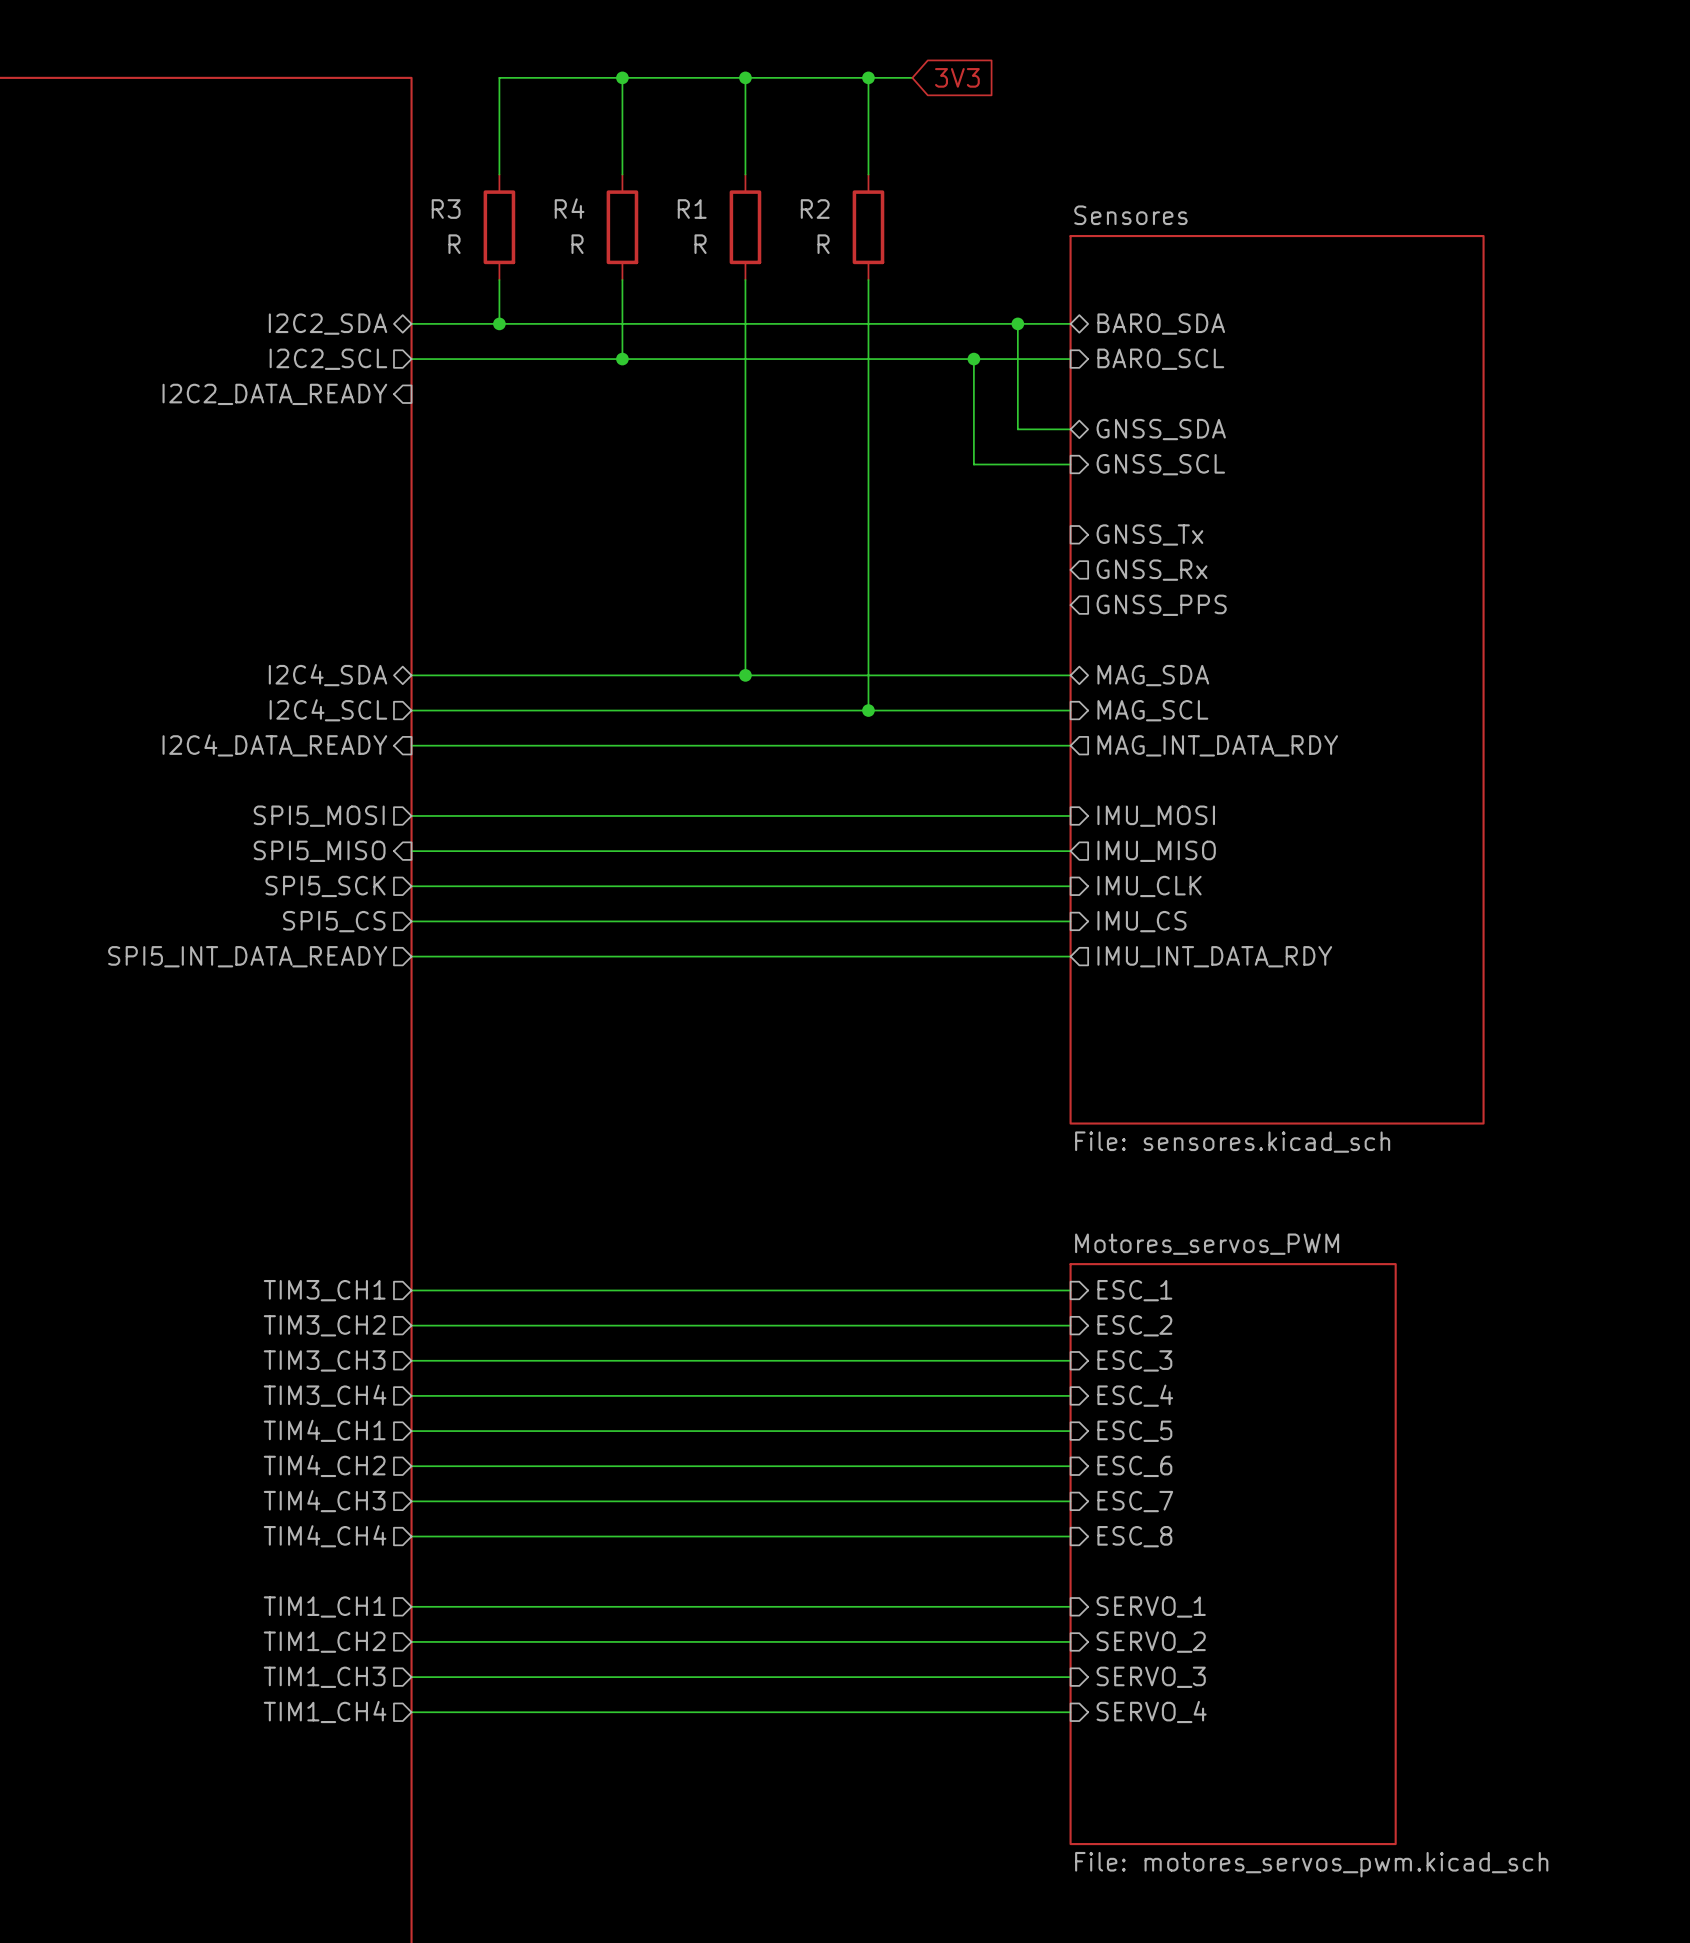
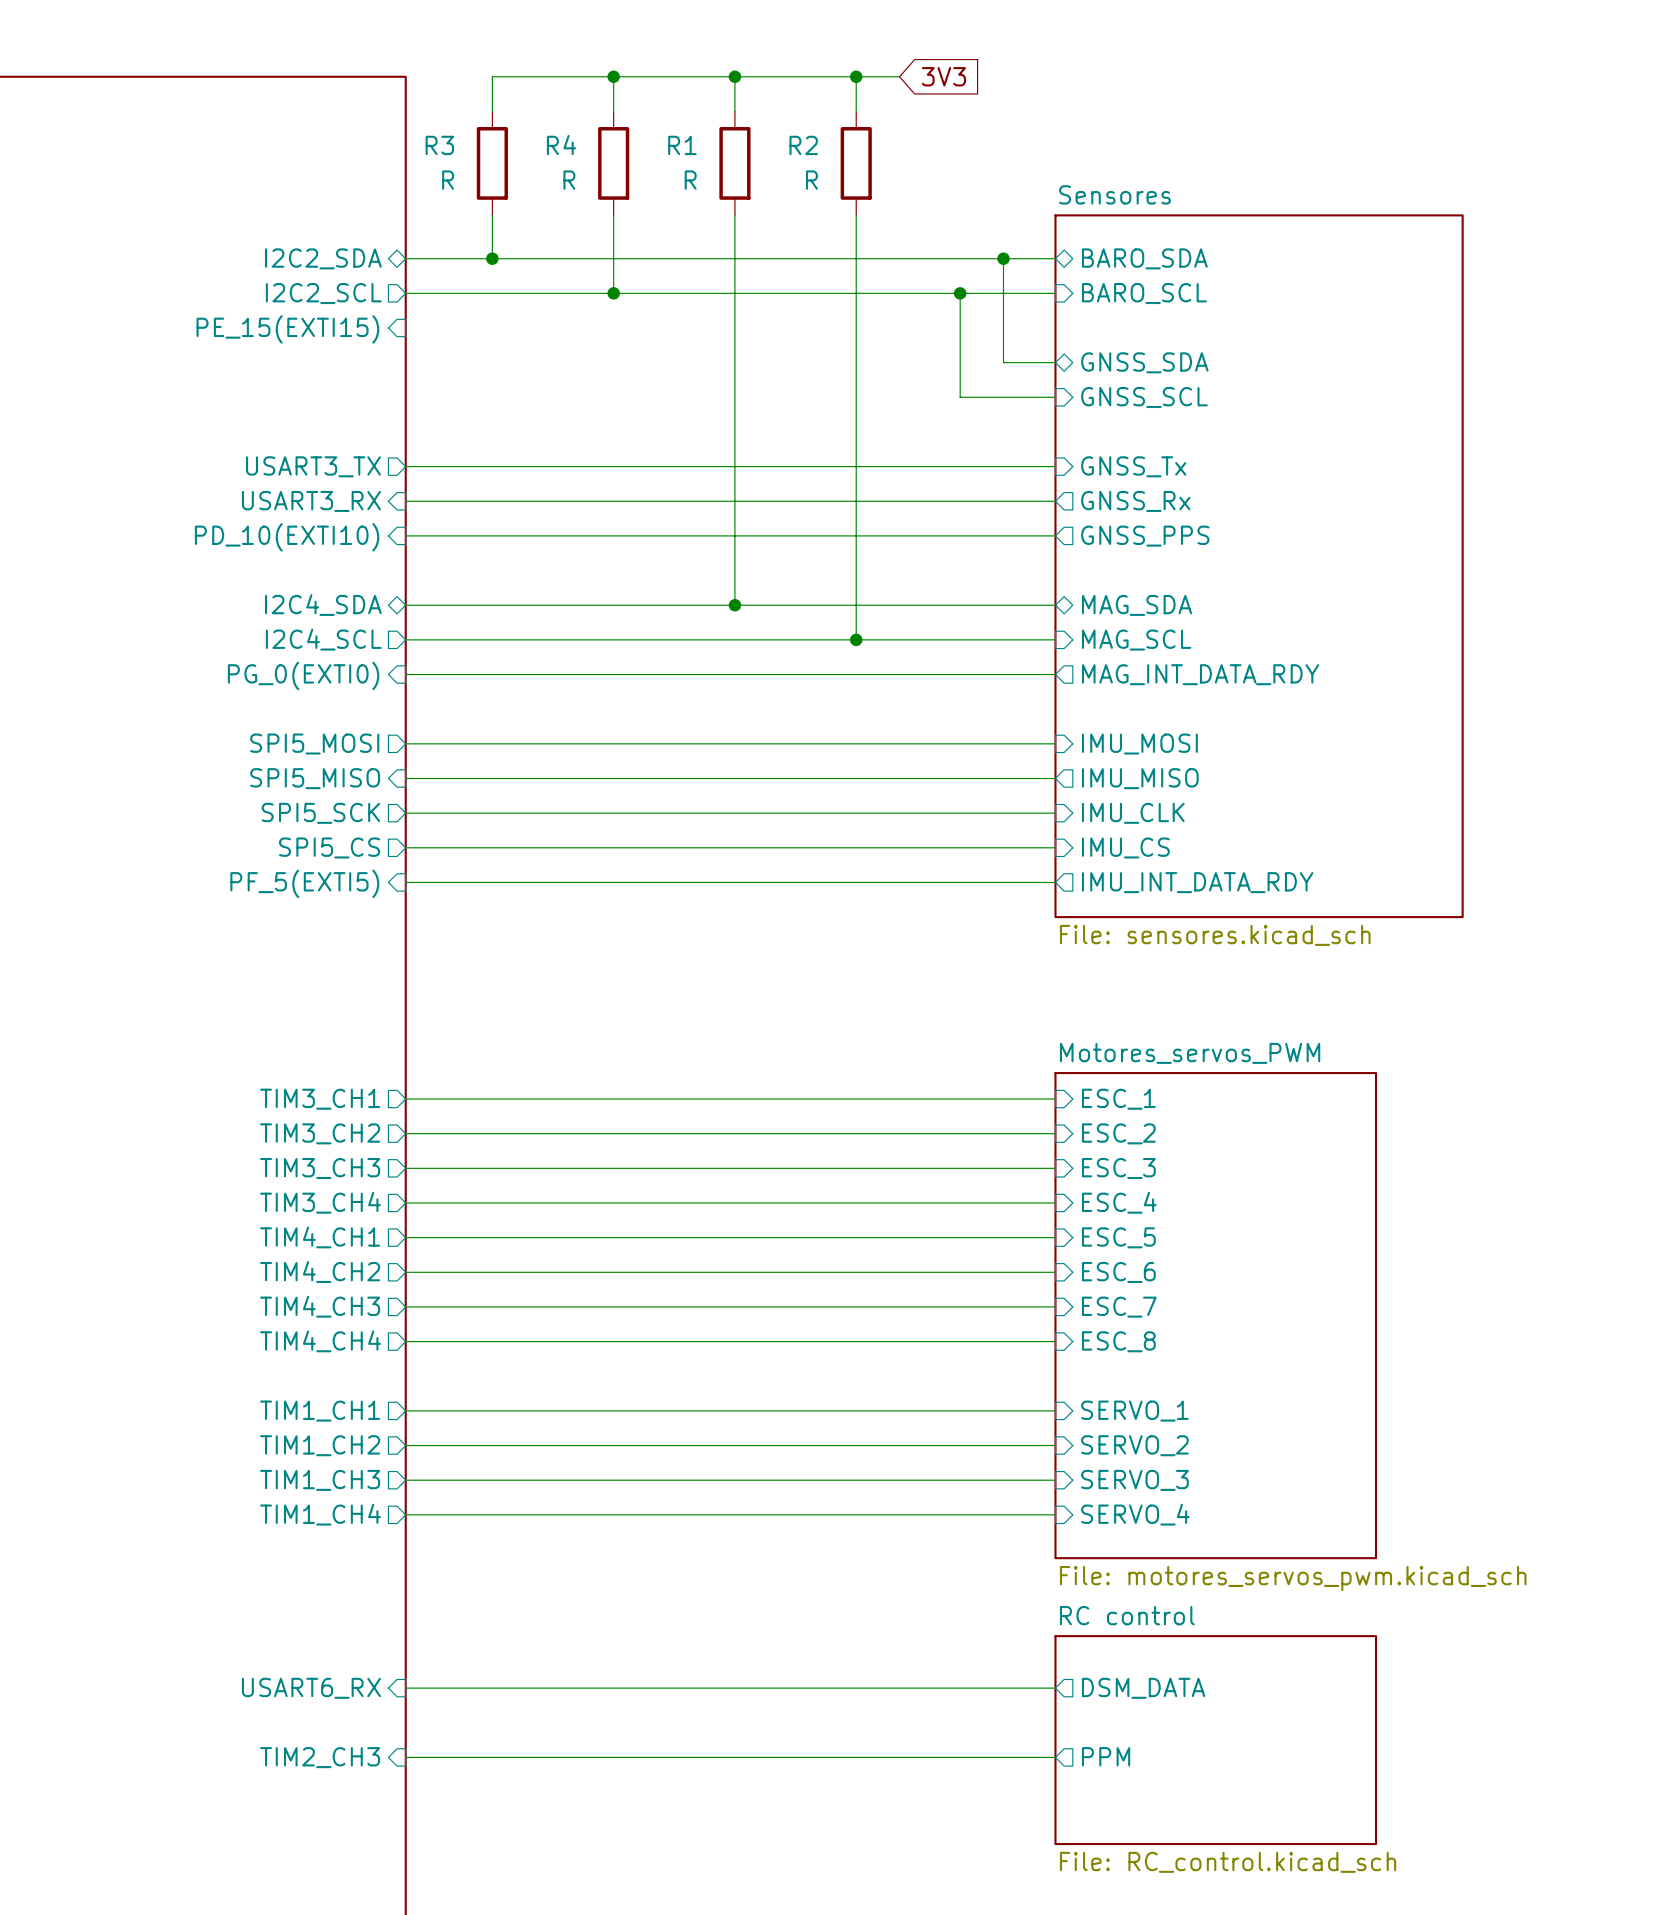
wire: (499, 113) (499, 174) -> none
wire: (622, 113) (622, 174) -> (613, 215) (613, 276)
wire: (745, 113) (745, 174) -> (734, 215) (734, 276)
wire: (868, 113) (868, 174) -> (856, 215) (856, 276)
R3 position: (499, 227) -> (492, 163)
R4 position: (622, 227) -> (613, 163)
R1 position: (745, 227) -> (734, 163)
R2 position: (868, 227) -> (856, 163)
wire: none -> (1003, 258) (1003, 319)
junction: none -> (1003, 258)
wire: (499, 279) (499, 323) -> (492, 215) (492, 258)
wire: (622, 297) (622, 359) -> none
wire: none -> (960, 293) (960, 354)
junction: none -> (960, 293)
wire: (411, 323) (1070, 323) -> (405, 258) (1055, 258)
junction position: (499, 323) -> (492, 258)
junction: (1017, 323) -> none
sheet pin position: I2C2_SDA (328, 324) -> I2C2_SDA (323, 258)
sheet pin position: BARO_SDA (1161, 324) -> BARO_SDA (1144, 258)
sheet pin: none -> PE_15(EXTI15) (287, 329)
sheet pin position: I2C2_SCL (328, 359) -> I2C2_SCL (323, 293)
wire: (411, 359) (1070, 359) -> (405, 293) (1055, 293)
junction position: (622, 359) -> (613, 293)
junction: (973, 359) -> none
sheet pin position: BARO_SCL (1160, 359) -> BARO_SCL (1144, 293)
wire: (1017, 367) (1017, 429) (1070, 429) -> (1003, 362) (1055, 362)
sheet pin: I2C2_DATA_READY (274, 394) -> none
wire: (973, 402) (973, 464) (1070, 464) -> (960, 397) (1055, 397)
sheet pin position: GNSS_SDA (1161, 429) -> GNSS_SDA (1144, 362)
sheet pin position: GNSS_SCL (1160, 464) -> GNSS_SCL (1144, 397)
sheet pin: none -> USART3_TX (313, 466)
wire: none -> (405, 466) (1055, 466)
sheet pin: none -> USART3_RX (311, 501)
wire: none -> (405, 501) (1055, 501)
sheet pin position: GNSS_Tx (1149, 534) -> GNSS_Tx (1133, 466)
wire: none -> (405, 535) (1055, 535)
sheet pin: none -> PD_10(EXTI10) (287, 537)
sheet pin position: GNSS_Rx (1152, 570) -> GNSS_Rx (1135, 501)
sheet Sensores: none -> File: sensores.kicad_sch (1259, 566)
sheet pin position: GNSS_PPS (1161, 605) -> GNSS_PPS (1145, 536)
wire: (745, 613) (745, 675) -> none
wire: (868, 649) (868, 710) -> none
sheet pin position: I2C4_SDA (328, 675) -> I2C4_SDA (323, 604)
wire: (411, 675) (1070, 675) -> (405, 605) (1055, 605)
junction position: (745, 675) -> (734, 605)
sheet pin position: MAG_SDA (1153, 675) -> MAG_SDA (1137, 605)
sheet Sensores: File: sensores.kicad_sch (1277, 679) -> none
sheet pin: none -> PG_0(EXTI0) (303, 675)
sheet pin position: I2C4_SCL (328, 710) -> I2C4_SCL (323, 639)
wire: (411, 710) (1070, 710) -> (405, 639) (1055, 639)
junction position: (868, 710) -> (856, 639)
sheet pin position: MAG_SCL (1152, 710) -> MAG_SCL (1136, 640)
sheet pin: I2C4_DATA_READY (274, 745) -> none
wire: (411, 745) (1070, 745) -> (405, 674) (1055, 674)
sheet pin position: MAG_INT_DATA_RDY (1217, 745) -> MAG_INT_DATA_RDY (1200, 674)
wire: (411, 815) (1070, 815) -> (405, 743) (1055, 743)
sheet pin position: SPI5_MOSI (319, 816) -> SPI5_MOSI (314, 744)
sheet pin position: IMU_MOSI (1156, 816) -> IMU_MOSI (1139, 744)
sheet pin position: SPI5_MISO (319, 851) -> SPI5_MISO (315, 778)
wire: (411, 851) (1070, 851) -> (405, 778) (1055, 778)
sheet pin position: IMU_MISO (1156, 851) -> IMU_MISO (1140, 778)
sheet pin position: SPI5_SCK (325, 886) -> SPI5_SCK (320, 813)
wire: (411, 886) (1070, 886) -> (405, 813) (1055, 813)
sheet pin position: IMU_CLK (1149, 886) -> IMU_CLK (1133, 813)
sheet pin: none -> PF_5(EXTI5) (304, 883)
sheet pin position: SPI5_CS (334, 921) -> SPI5_CS (329, 847)
wire: (411, 921) (1070, 921) -> (405, 847) (1055, 847)
sheet pin position: IMU_CS (1141, 921) -> IMU_CS (1125, 847)
sheet pin: SPI5_INT_DATA_READY (247, 956) -> none
wire: (411, 956) (1070, 956) -> (405, 882) (1055, 882)
sheet pin position: IMU_INT_DATA_RDY (1214, 956) -> IMU_INT_DATA_RDY (1197, 882)
sheet pin: none -> TIM3_CH1 (320, 1099)
wire: none -> (405, 1099) (1055, 1099)
sheet pin: none -> ESC_1 (1118, 1099)
wire: none -> (405, 1133) (1055, 1133)
sheet pin: none -> TIM3_CH2 (320, 1133)
sheet pin: none -> ESC_2 (1118, 1133)
sheet pin: none -> TIM3_CH3 (320, 1168)
wire: none -> (405, 1168) (1055, 1168)
sheet pin: none -> ESC_3 (1118, 1168)
wire: none -> (405, 1202) (1055, 1202)
sheet pin: none -> TIM4_CH1 (320, 1237)
sheet pin: none -> ESC_5 (1118, 1237)
sheet pin: TIM3_CH1 (324, 1290) -> TIM4_CH2 (320, 1272)
sheet pin: ESC_1 (1134, 1290) -> ESC_6 (1118, 1272)
sheet pin: TIM3_CH2 (324, 1325) -> TIM4_CH3 (320, 1306)
sheet pin: ESC_2 (1134, 1325) -> ESC_7 (1119, 1307)
sheet Motores_servos_PWM: none -> File: motores_servos_pwm.kicad_sch (1215, 1315)
sheet pin: TIM3_CH3 (324, 1360) -> TIM4_CH4 (320, 1341)
sheet pin: ESC_3 (1134, 1360) -> ESC_8 (1118, 1341)
sheet pin position: TIM3_CH4 (325, 1395) -> TIM3_CH4 (320, 1202)
wire: (411, 1395) (1070, 1395) -> (405, 1237) (1055, 1237)
sheet pin position: ESC_4 (1135, 1395) -> ESC_4 (1119, 1202)
sheet pin: TIM4_CH1 (324, 1430) -> TIM1_CH1 (320, 1411)
sheet pin: ESC_5 (1134, 1431) -> SERVO_1 (1134, 1411)
sheet pin: TIM4_CH2 (324, 1465) -> TIM1_CH2 (320, 1445)
sheet pin: ESC_6 (1134, 1466) -> SERVO_2 (1134, 1445)
sheet pin: TIM4_CH3 (324, 1501) -> TIM1_CH3 (320, 1480)
sheet pin: ESC_7 (1135, 1501) -> SERVO_3 (1134, 1480)
sheet pin: TIM4_CH4 (325, 1536) -> TIM1_CH4 (320, 1514)
sheet pin: ESC_8 (1134, 1536) -> SERVO_4 (1135, 1514)
sheet Motores_servos_PWM: File: motores_servos_pwm.kicad_sch (1233, 1554) -> none
sheet pin: TIM1_CH1 (324, 1606) -> none
wire: (411, 1606) (1070, 1606) -> none
sheet pin: SERVO_1 (1151, 1606) -> none
wire: (411, 1641) (1070, 1641) -> none
sheet pin: TIM1_CH2 (324, 1642) -> none
sheet pin: SERVO_2 (1151, 1642) -> none
sheet pin: TIM1_CH3 (324, 1677) -> none
wire: (411, 1677) (1070, 1677) -> (405, 1757) (1055, 1757)
sheet pin: SERVO_3 (1151, 1677) -> none
sheet pin shape: output (325, 1712) -> input (311, 1688)
sheet pin: TIM1_CH4 (325, 1712) -> USART6_RX (311, 1688)
sheet pin shape: input (1151, 1712) -> output (1143, 1688)
sheet pin: SERVO_4 (1151, 1712) -> DSM_DATA (1143, 1688)
sheet RC control: none -> File: RC_control.kicad_sch (1215, 1740)
sheet pin: none -> PPM (1106, 1756)
sheet pin: none -> TIM2_CH3 (320, 1757)

